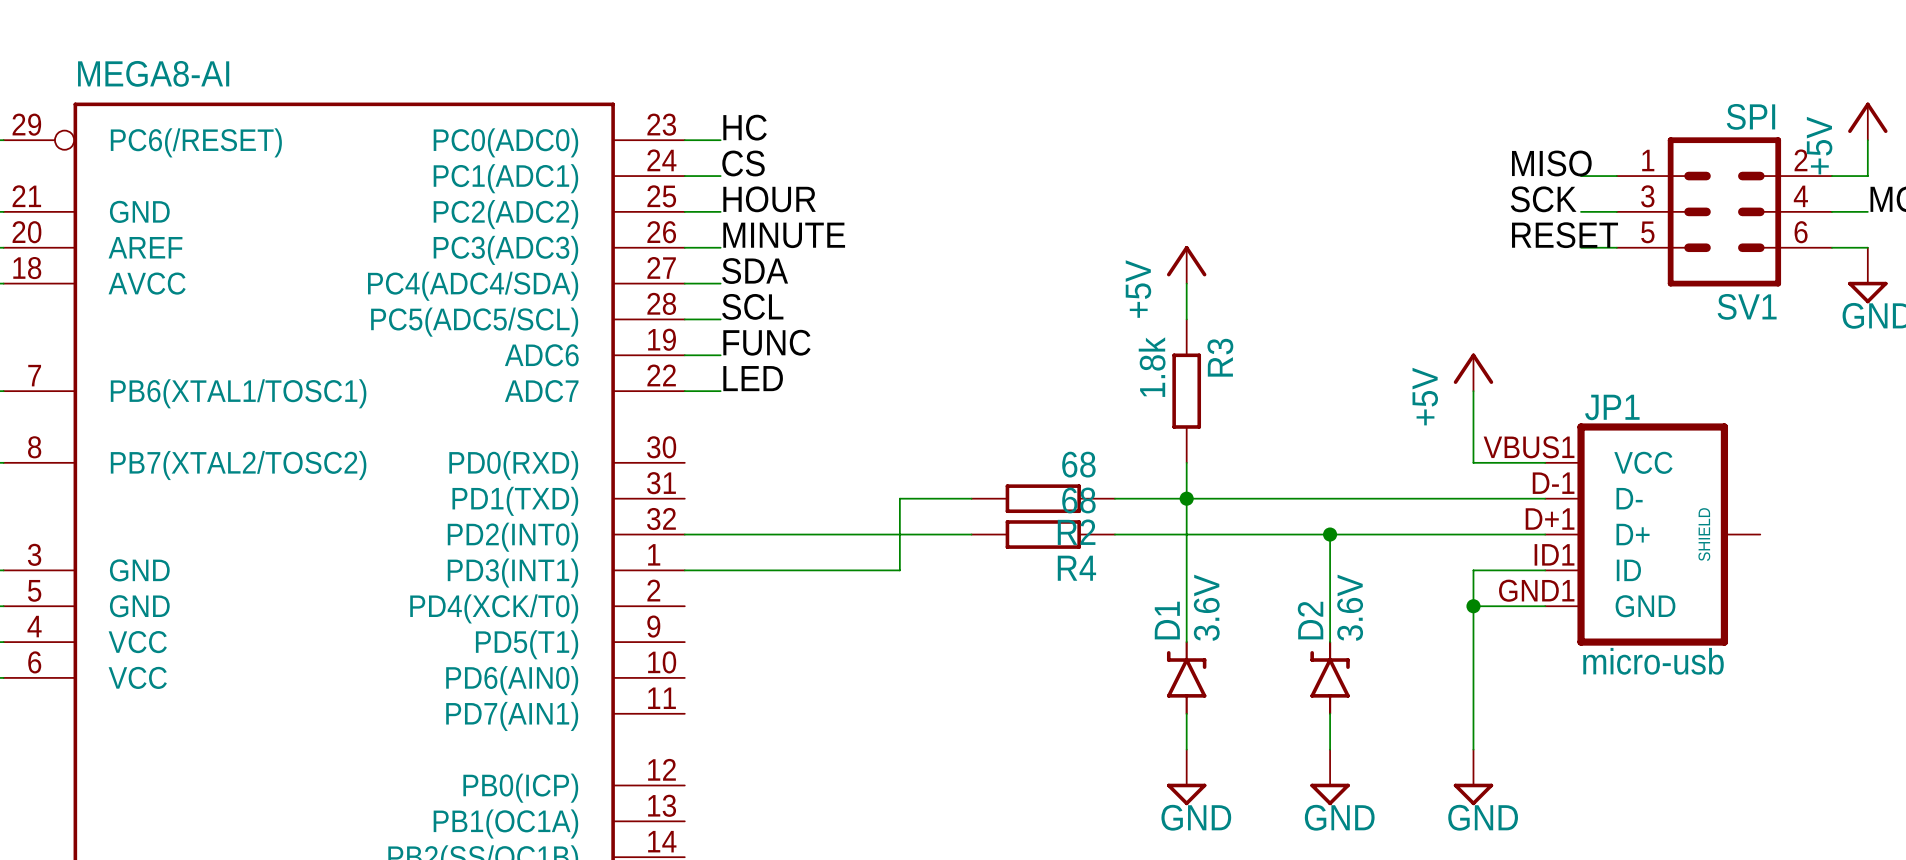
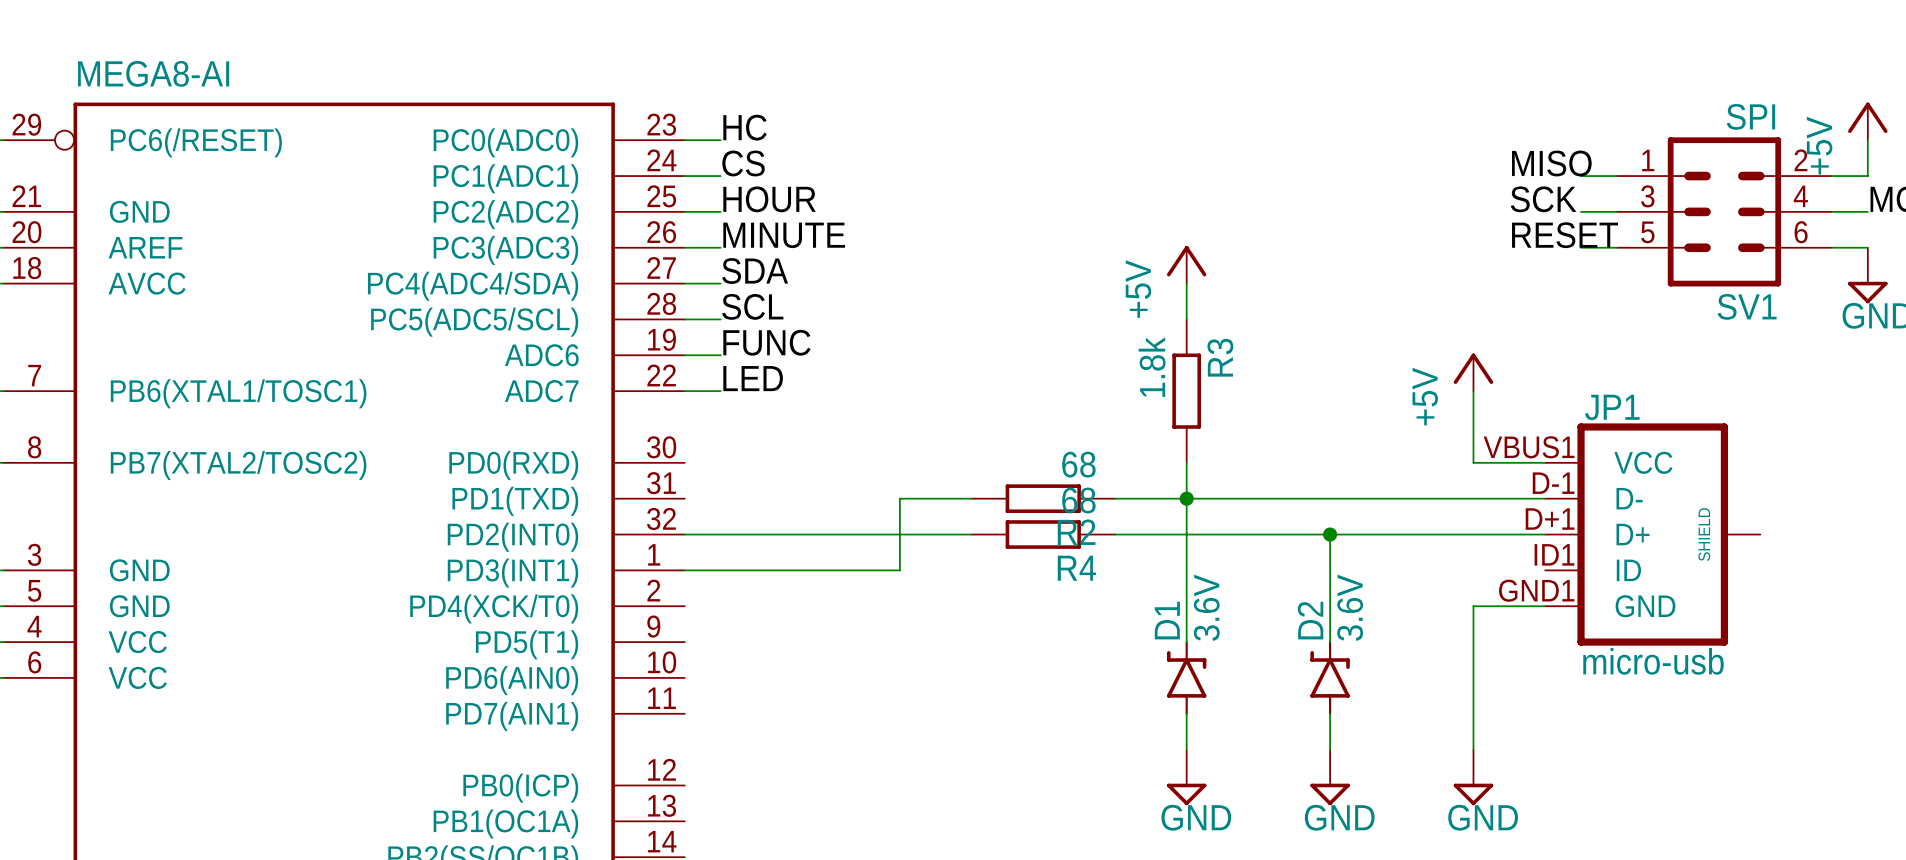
wire: (1545, 570) (1473, 570) (1473, 606) -> none
junction: (1473, 606) -> none

